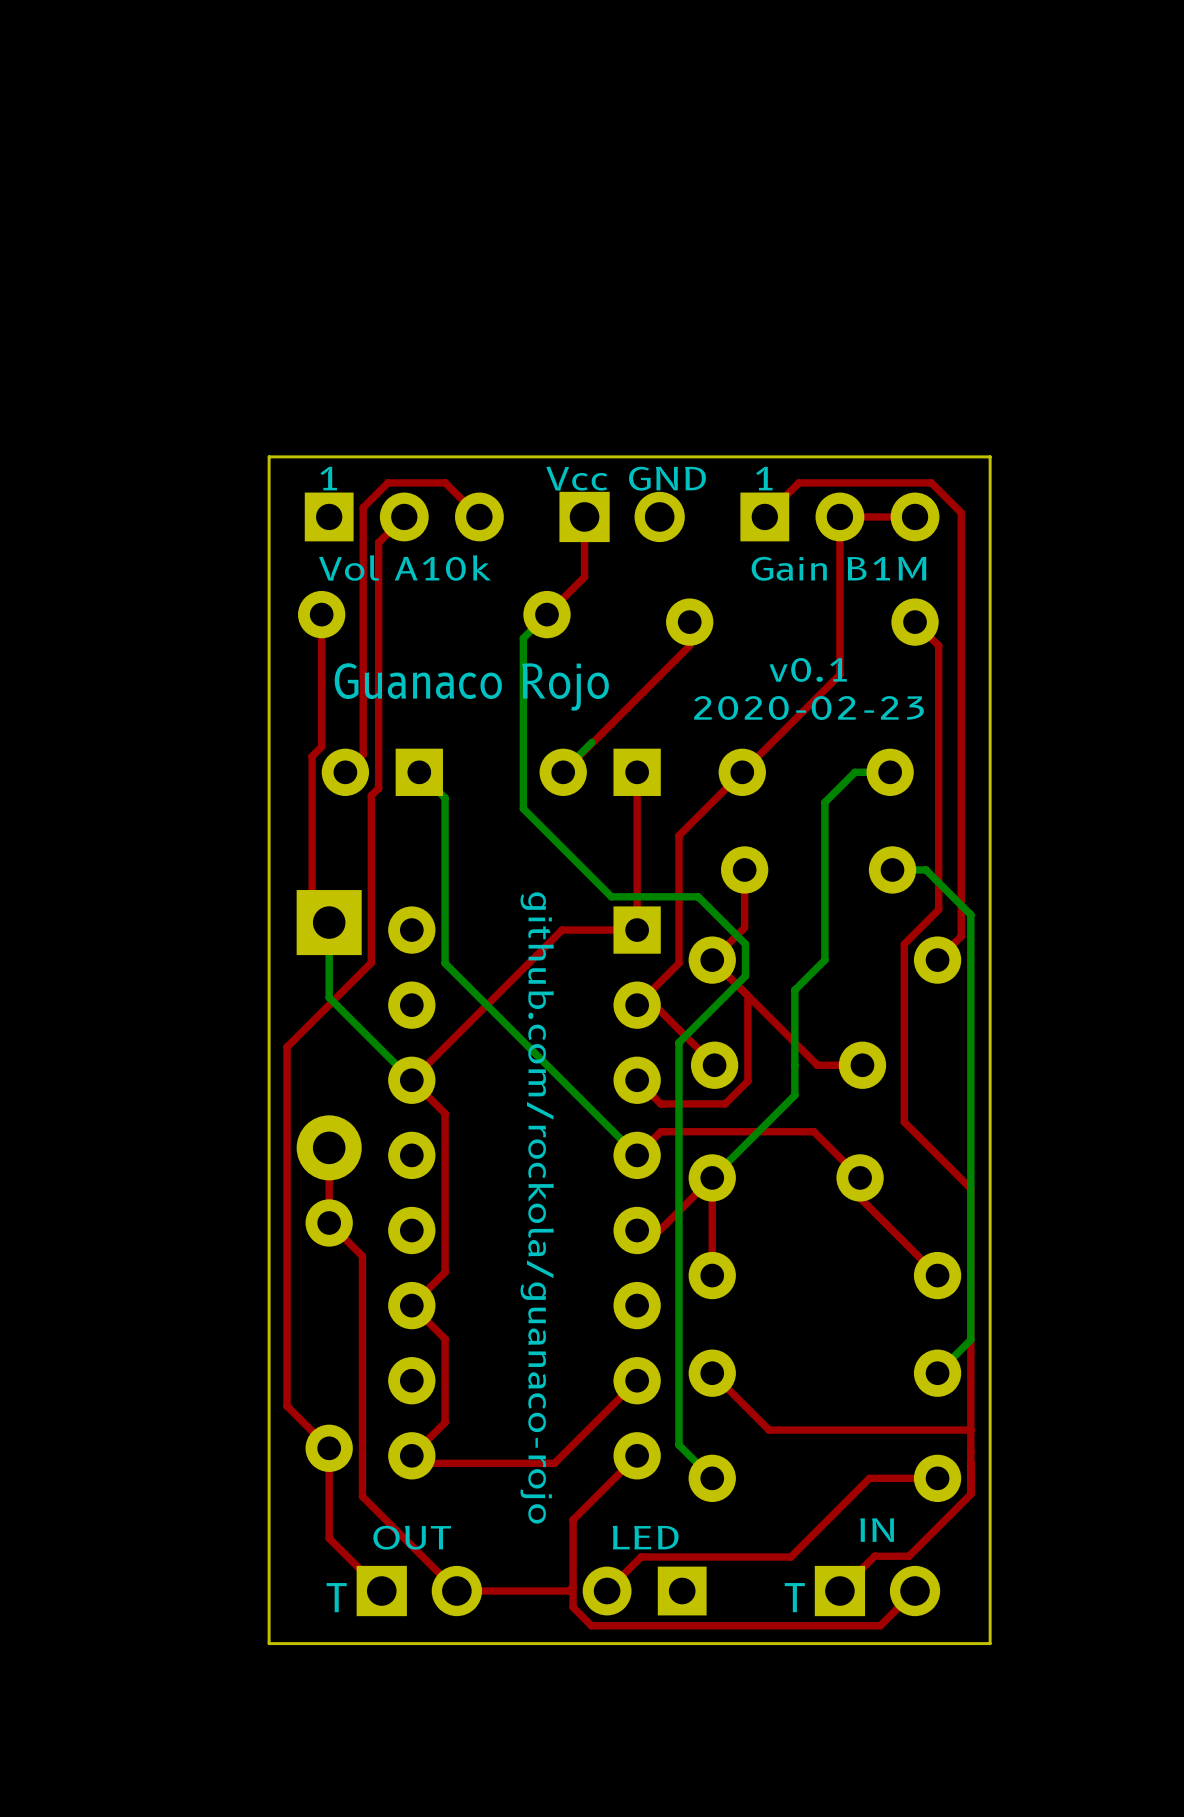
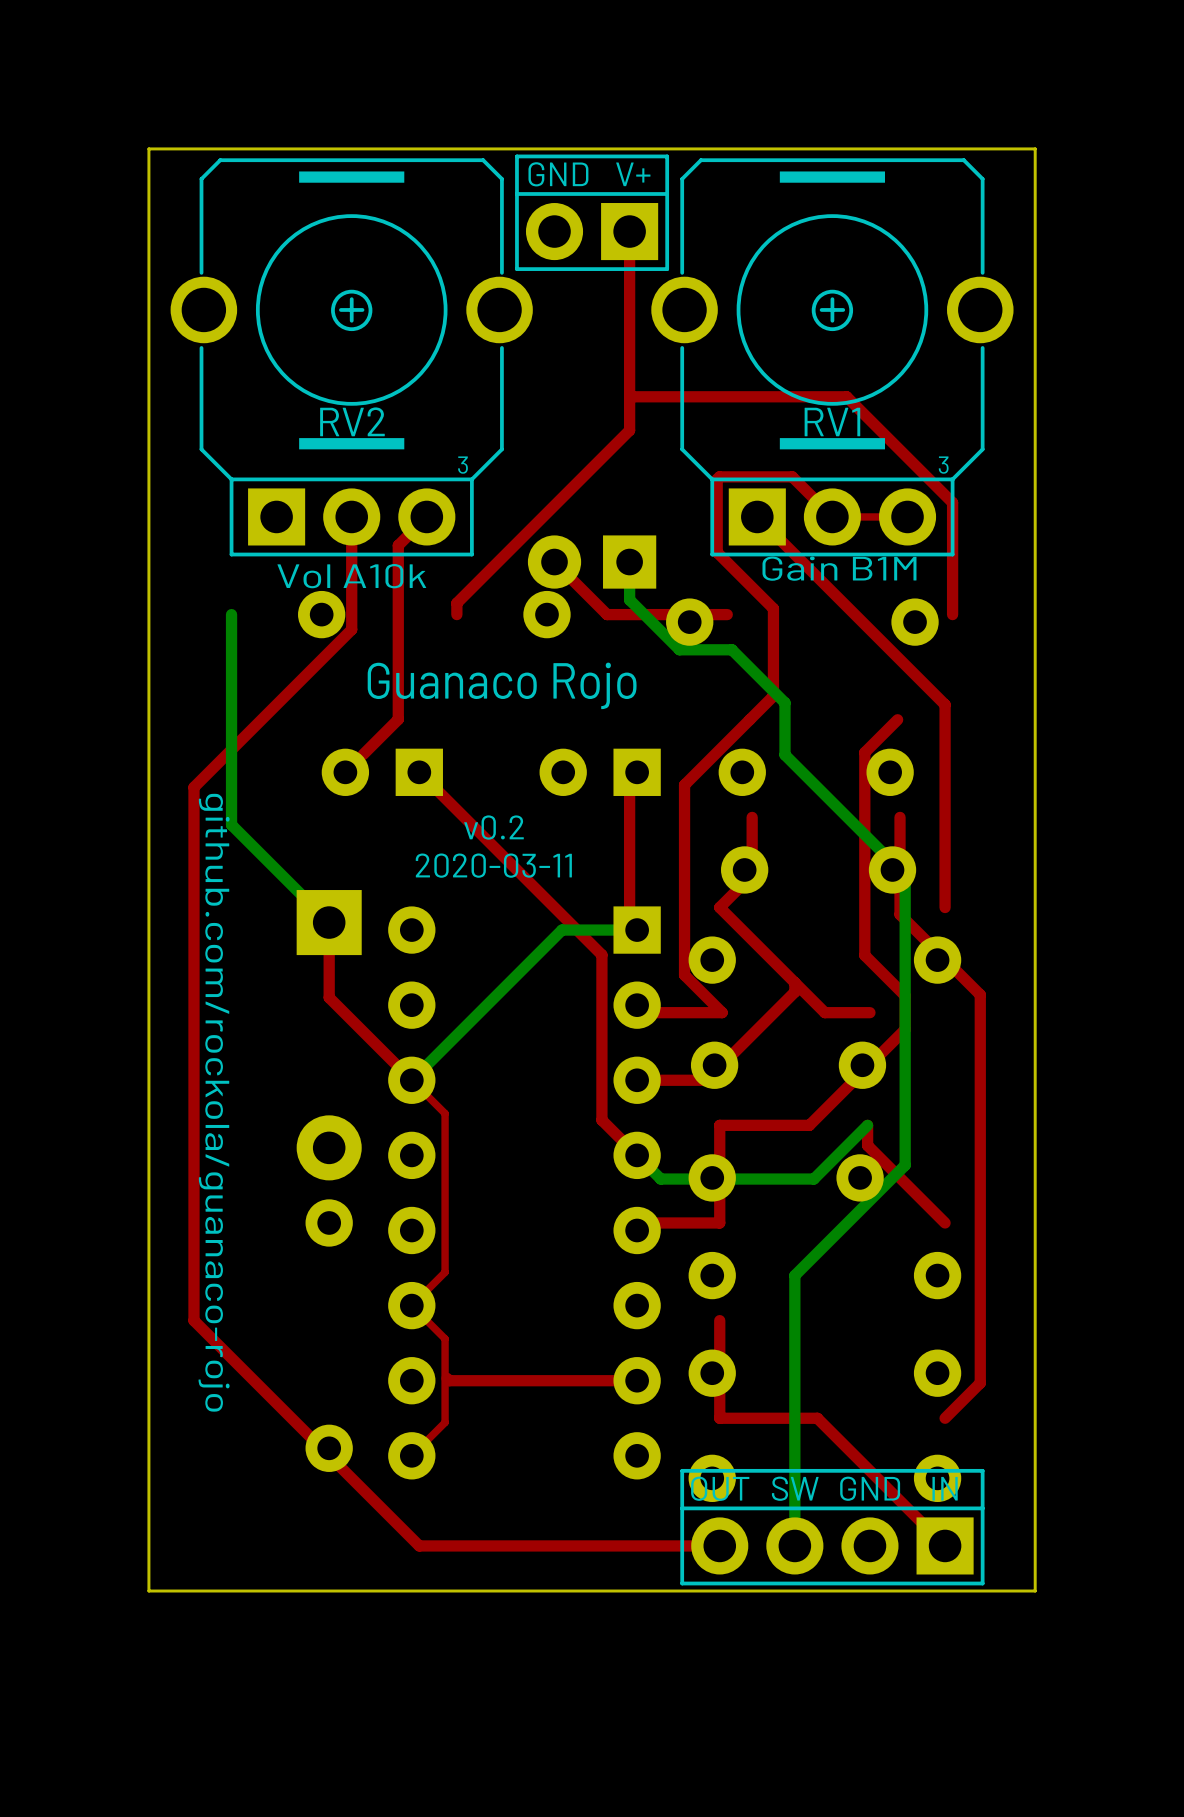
part: none -> (592, 212)
top track: none -> (629, 231) (629, 430) (456, 603) (456, 614)
RV2: none -> (351, 357)
RV1: none -> (832, 357)
top track: none -> (629, 396) (846, 396) (952, 502) (952, 614)
board edge: (990, 456) (269, 456) (269, 1643) (990, 1643) (990, 456) -> (1035, 148) (1035, 1591) (148, 1591) (148, 148) (1035, 148)
text: 1 (328, 478) -> none
text: Vcc (576, 478) -> none
text: GND (667, 478) -> none
text: 1 (764, 478) -> none
top track: none -> (351, 516) (351, 629) (193, 787) (193, 1320) (419, 1545) (719, 1545)
top track: (404, 516) (378, 542) (378, 788) (371, 795) (371, 962) (287, 1047) (287, 1406) (329, 1448) (329, 1538) (381, 1591) -> none
part: (404, 516) -> none
top track: (479, 516) (445, 482) (387, 482) (363, 507) (363, 754) -> (426, 516) (398, 545) (398, 719) (363, 754)
top track: (584, 516) (584, 577) (547, 614) -> none
part: (622, 516) -> none
top track: none -> (757, 516) (945, 704) (945, 907)
top track: (764, 516) (798, 482) (931, 482) (961, 512) (961, 936) (937, 960) -> none
top track: (839, 516) (839, 674) (678, 835) (678, 963) (637, 1005) (654, 1005) (714, 1065) -> (839, 516) (832, 516) (792, 476) (719, 476) (717, 479) (717, 552) (773, 608) (773, 696) (684, 785) (684, 975) (722, 1012) (644, 1012) (637, 1005)
part: (839, 516) -> none
top track: none -> (554, 562) (607, 614) (727, 614)
part: none -> (592, 562)
bottom track: none -> (629, 562) (629, 599) (679, 649) (731, 649) (785, 702) (785, 754) (905, 875) (905, 1165) (794, 1275) (794, 1545)
text position: Vol A10k (404, 568) -> Vol A10k (351, 576)
bottom track: none -> (231, 614) (231, 824) (329, 922)
top track: (321, 614) (321, 746) (312, 756) (312, 905) (329, 922) -> (411, 1080) (329, 997) (329, 922)
bottom track: (547, 614) (523, 638) (523, 808) (611, 896) (698, 896) (745, 944) (745, 976) (678, 1042) (678, 1445) (712, 1478) -> none
top track: (689, 622) (689, 645) (563, 772) -> none
top track: (915, 622) (938, 645) (938, 909) (904, 944) (904, 1122) (970, 1188) (970, 1494) (908, 1556) (874, 1556) (839, 1591) -> none
text: v0.1 (808, 669) -> none
text position: Guanaco Rojo (471, 686) -> Guanaco Rojo (502, 685)
text: 2020-02-23 (809, 708) -> none
bottom track: (592, 742) (563, 771) -> none
bottom track: (419, 772) (445, 798) (445, 963) (637, 1155) -> (867, 1125) (813, 1179) (660, 1179) (637, 1155)
top track: (629, 772) (637, 779) (637, 930) (562, 930) (411, 1080) -> (629, 772) (629, 922) (637, 930)
bottom track: (890, 772) (854, 772) (824, 802) (824, 960) (794, 990) (794, 1095) (712, 1177) -> none
top track: none -> (900, 817) (900, 914) (980, 994) (980, 1383) (945, 1418)
text: none -> v0.2 (493, 827)
text: none -> 2020-03-11 (493, 865)
top track: (744, 869) (744, 927) (712, 960) (817, 1065) (862, 1065) -> (752, 817) (752, 875) (719, 907) (824, 1012) (869, 1012)
bottom track: (892, 869) (925, 869) (970, 914) (970, 1339) (937, 1373) -> none
bottom track: (329, 922) (329, 997) (411, 1080) -> (637, 930) (562, 930) (411, 1080)
top track: (747, 995) (747, 1081) (725, 1103) (660, 1103) (637, 1080) -> (794, 982) (794, 992) (706, 1080) (637, 1080)
top track: none -> (867, 1125) (867, 1145) (945, 1222)
top track: (329, 1147) (329, 1222) (362, 1256) (362, 1496) (456, 1591) (569, 1591) (573, 1587) -> none
top track: (637, 1155) (660, 1131) (813, 1131) (860, 1177) (860, 1198) (937, 1275) -> (637, 1155) (601, 1120) (601, 954) (419, 772)
text position: github.com/rockola/guanaco-rojo (537, 1207) -> github.com/rockola/guanaco-rojo (214, 1102)
top track: (637, 1230) (659, 1230) (712, 1177) (712, 1275) -> (637, 1230) (644, 1222) (719, 1222) (719, 1125) (809, 1125) (905, 1029) (905, 995) (864, 955) (864, 752) (897, 719)
top track: none -> (719, 1320) (719, 1418) (817, 1418) (945, 1545)
top track: (712, 1373) (769, 1430) (970, 1430) -> none
top track: (637, 1380) (554, 1463) (419, 1463) (411, 1455) -> (637, 1380) (449, 1380) (447, 1378)
top track: (637, 1455) (573, 1519) (573, 1607) (591, 1625) (880, 1625) (915, 1591) -> none
top track: (937, 1478) (869, 1478) (790, 1556) (641, 1556) (607, 1591) -> none
part: none -> (832, 1527)
text: IN (877, 1530) -> none
text: OUT (412, 1537) -> none
text: LED (645, 1537) -> none
part: (419, 1591) -> none
part: (644, 1591) -> none
part: (877, 1591) -> none
text: T (336, 1597) -> none
text: T (794, 1597) -> none

